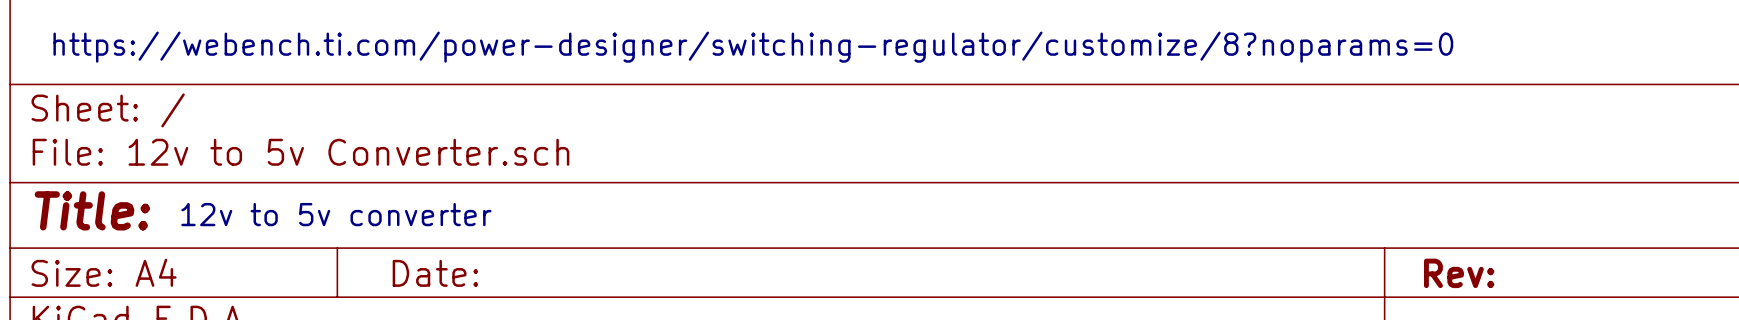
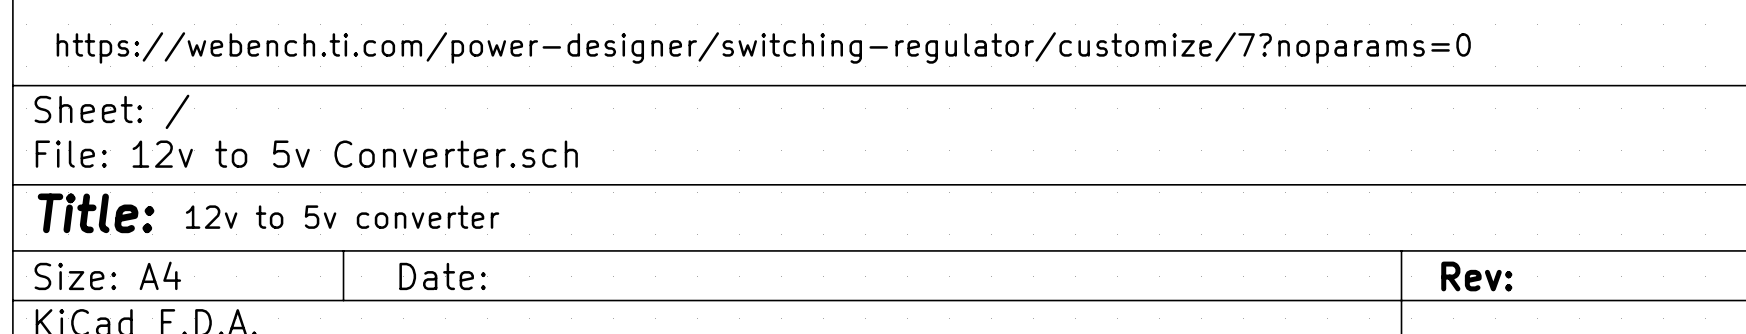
text: https://webench.ti.com/power-designer/switching-regulator/customize/8?noparams=0 (753, 47) -> https://webench.ti.com/power-designer/switching-regulator/customize/7?noparams=0 (763, 47)

